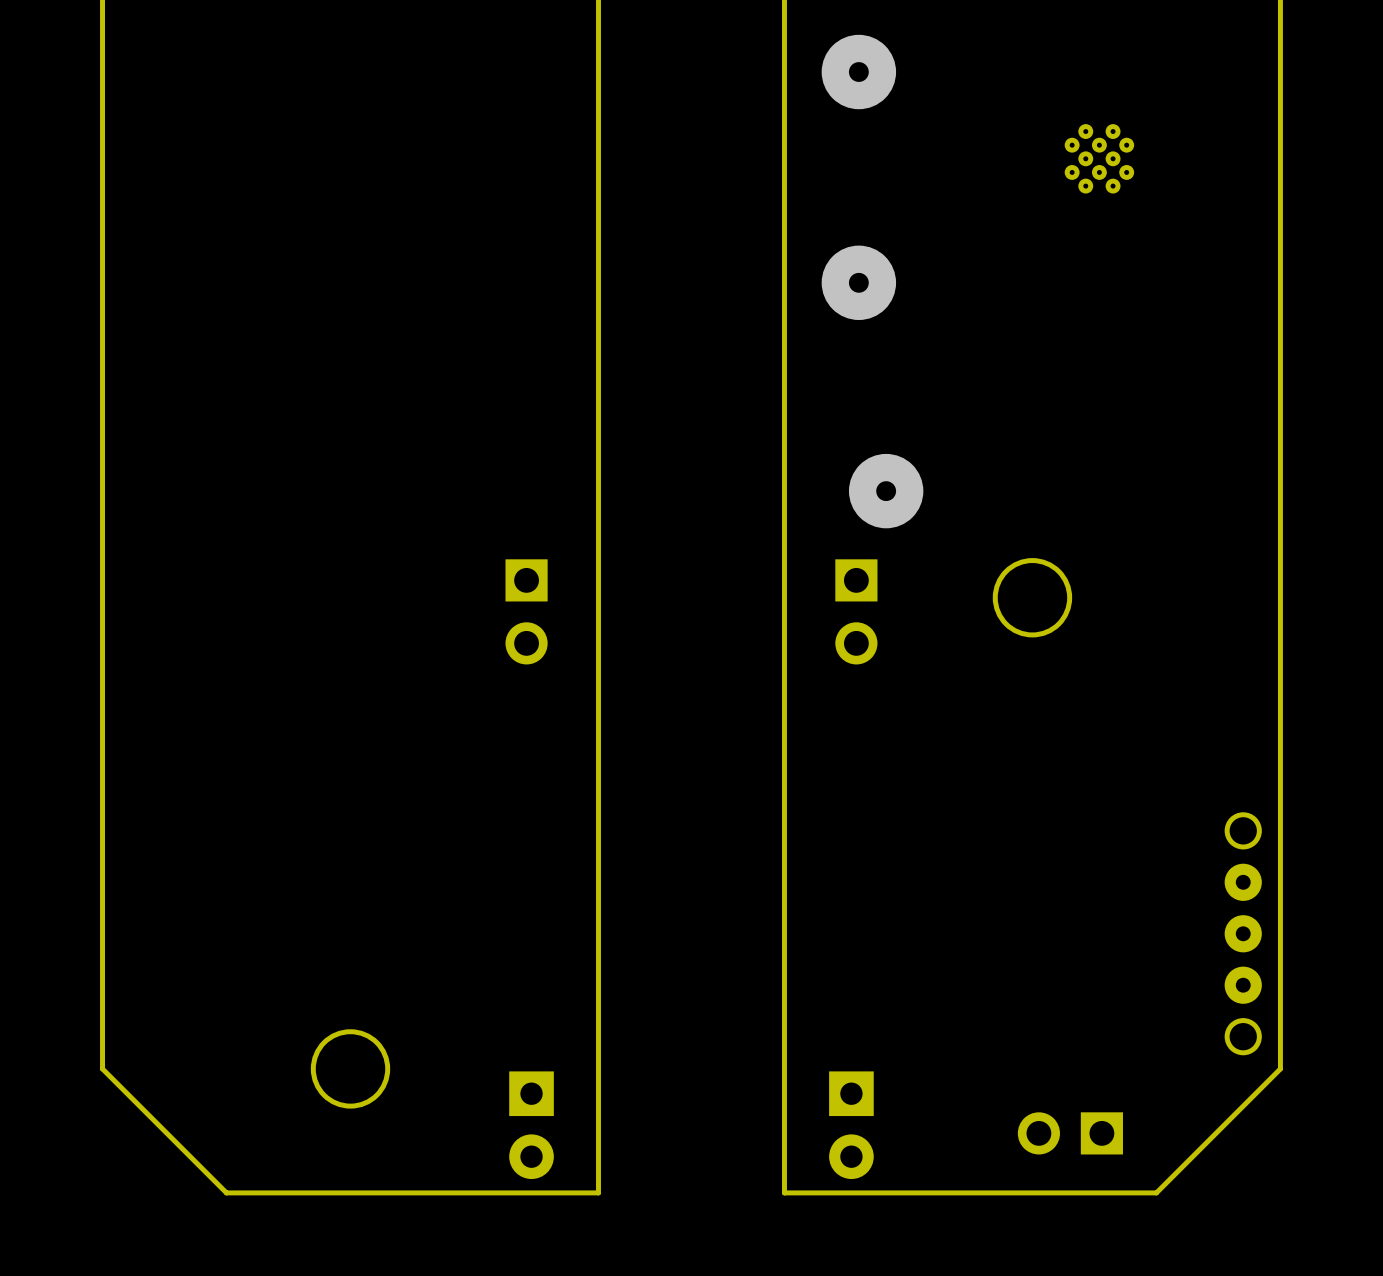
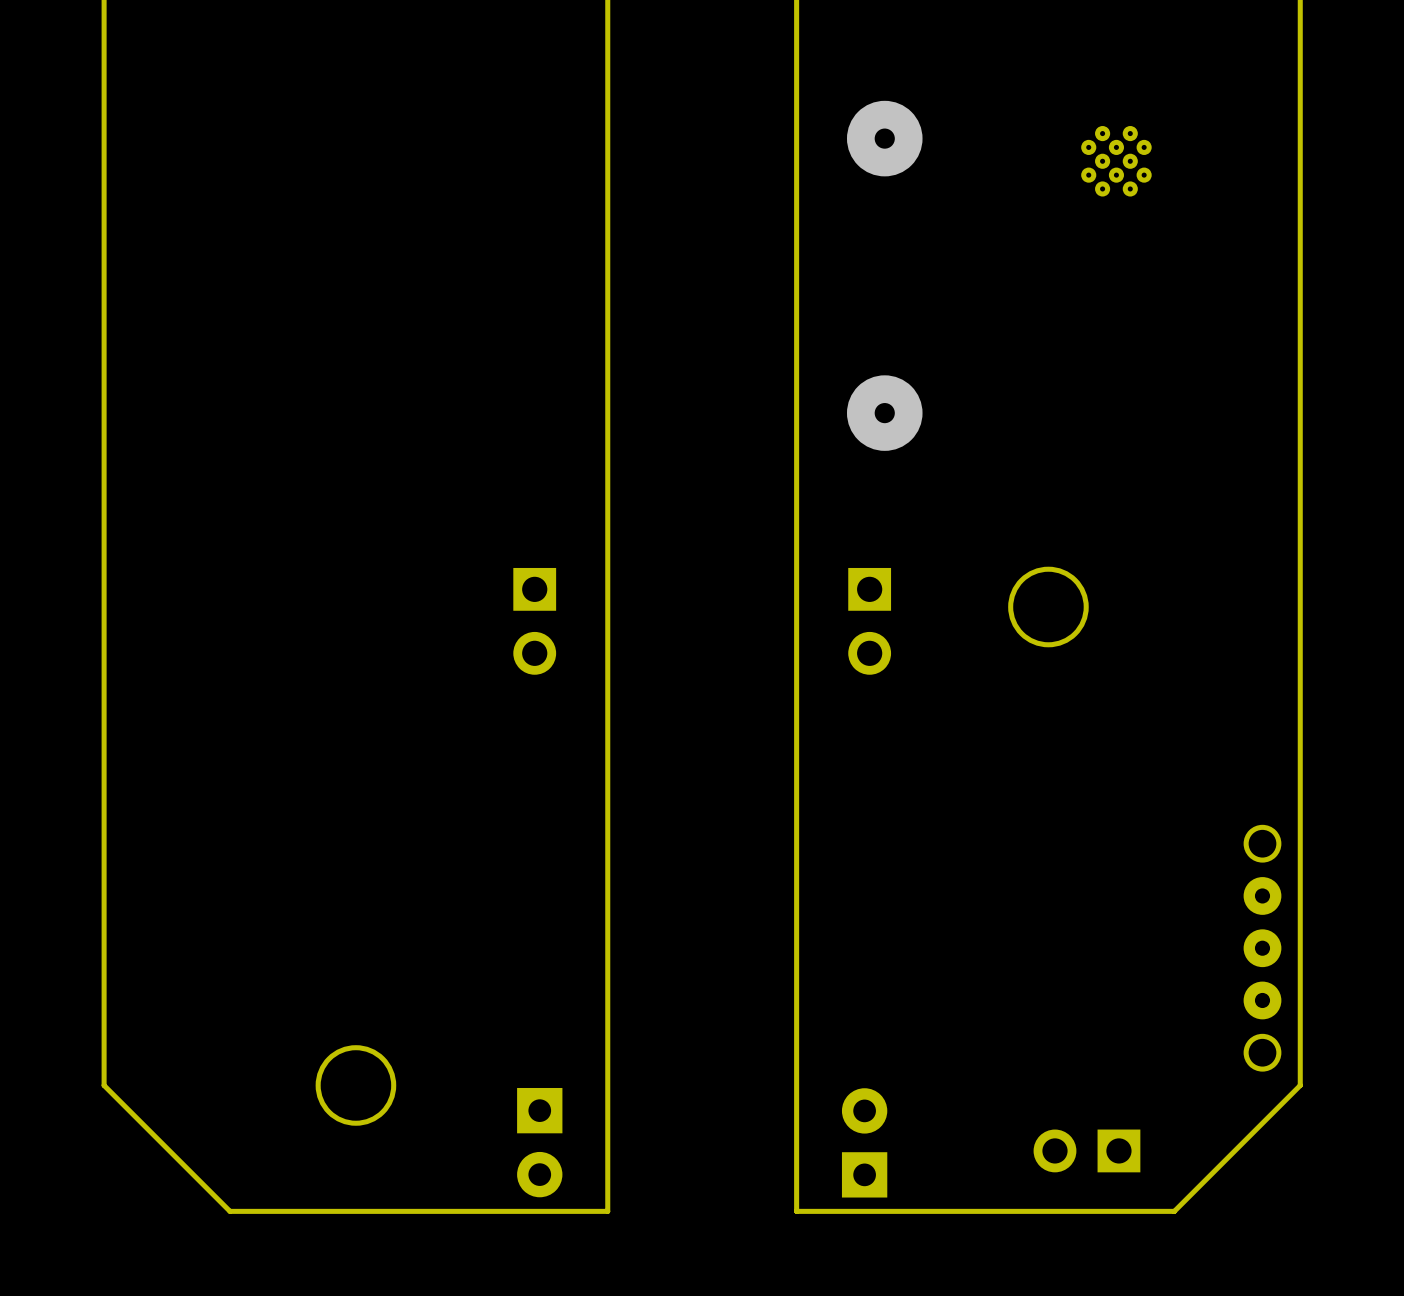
via position: (858, 72) -> (884, 138)
via: (858, 282) -> none
via: none -> (884, 413)
via: (886, 491) -> none
part rotation: 0° (851, 1125) -> 180° (864, 1142)

